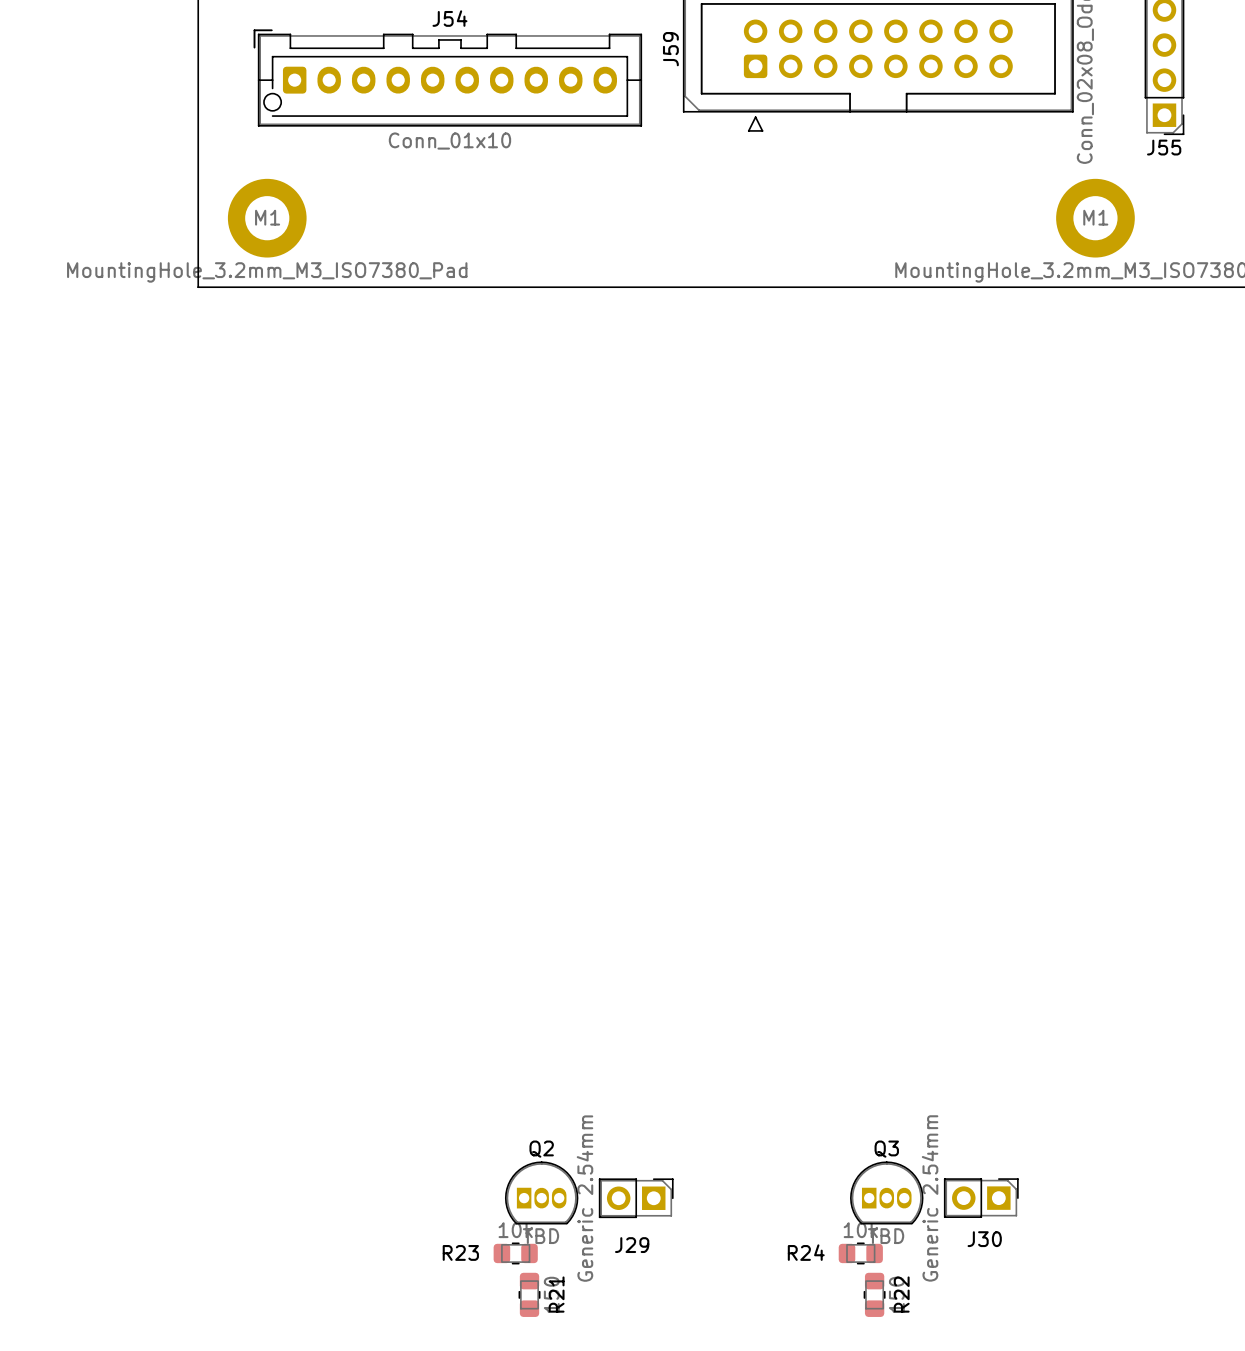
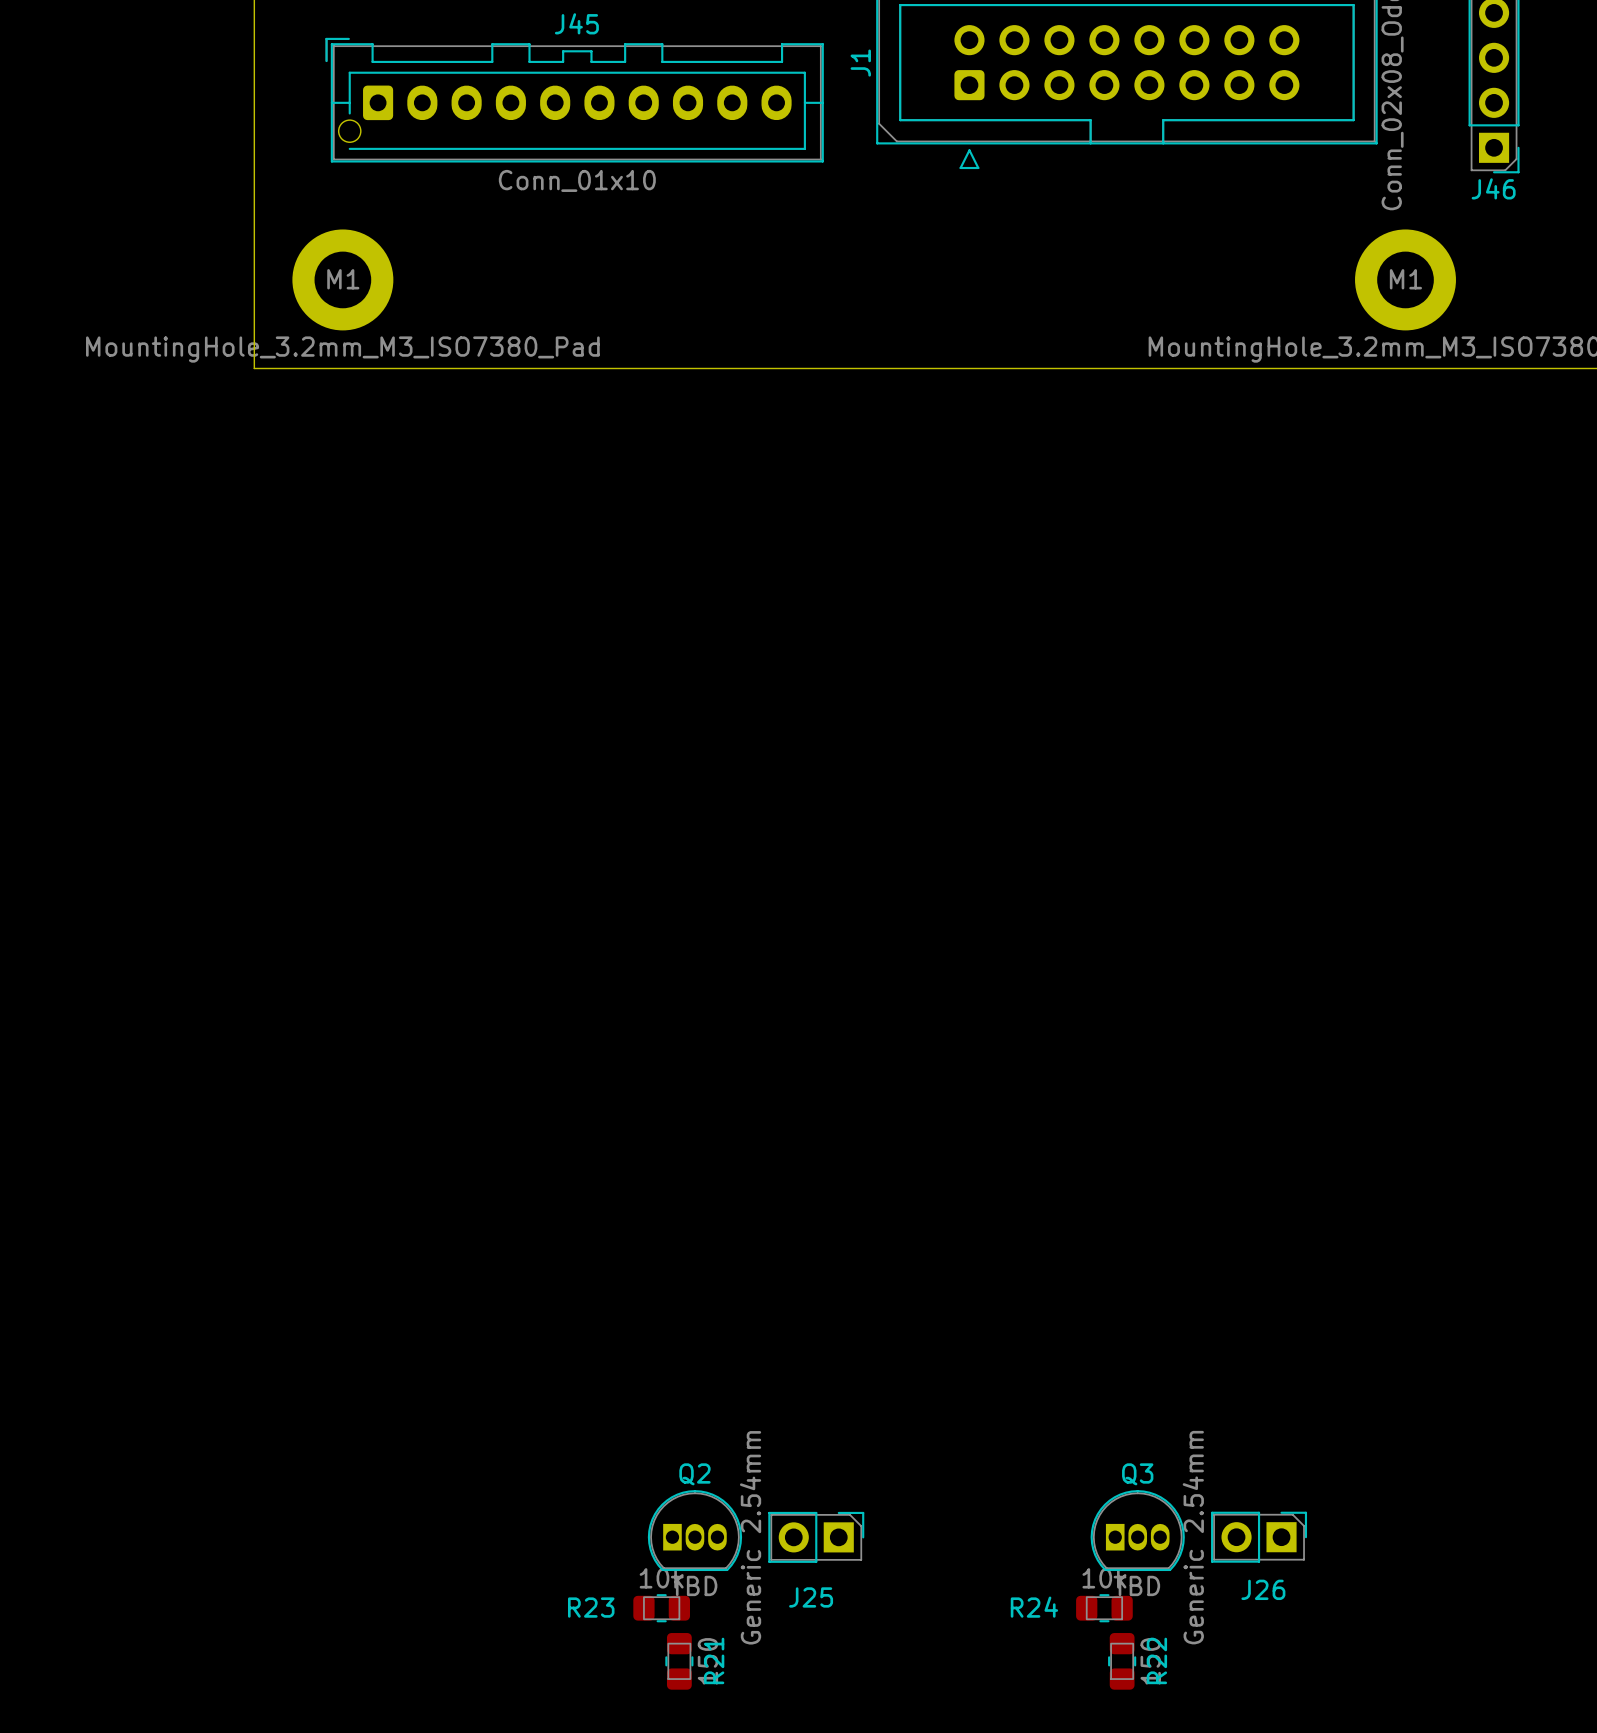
J54 name: J54 (449, 18) -> J45 (576, 23)
J59 name: J59 (670, 49) -> J1 (860, 63)
J55 name: J55 (1164, 147) -> J46 (1493, 188)
J30 name: J30 (984, 1239) -> J26 (1263, 1589)
J29 name: J29 (632, 1245) -> J25 (811, 1597)

